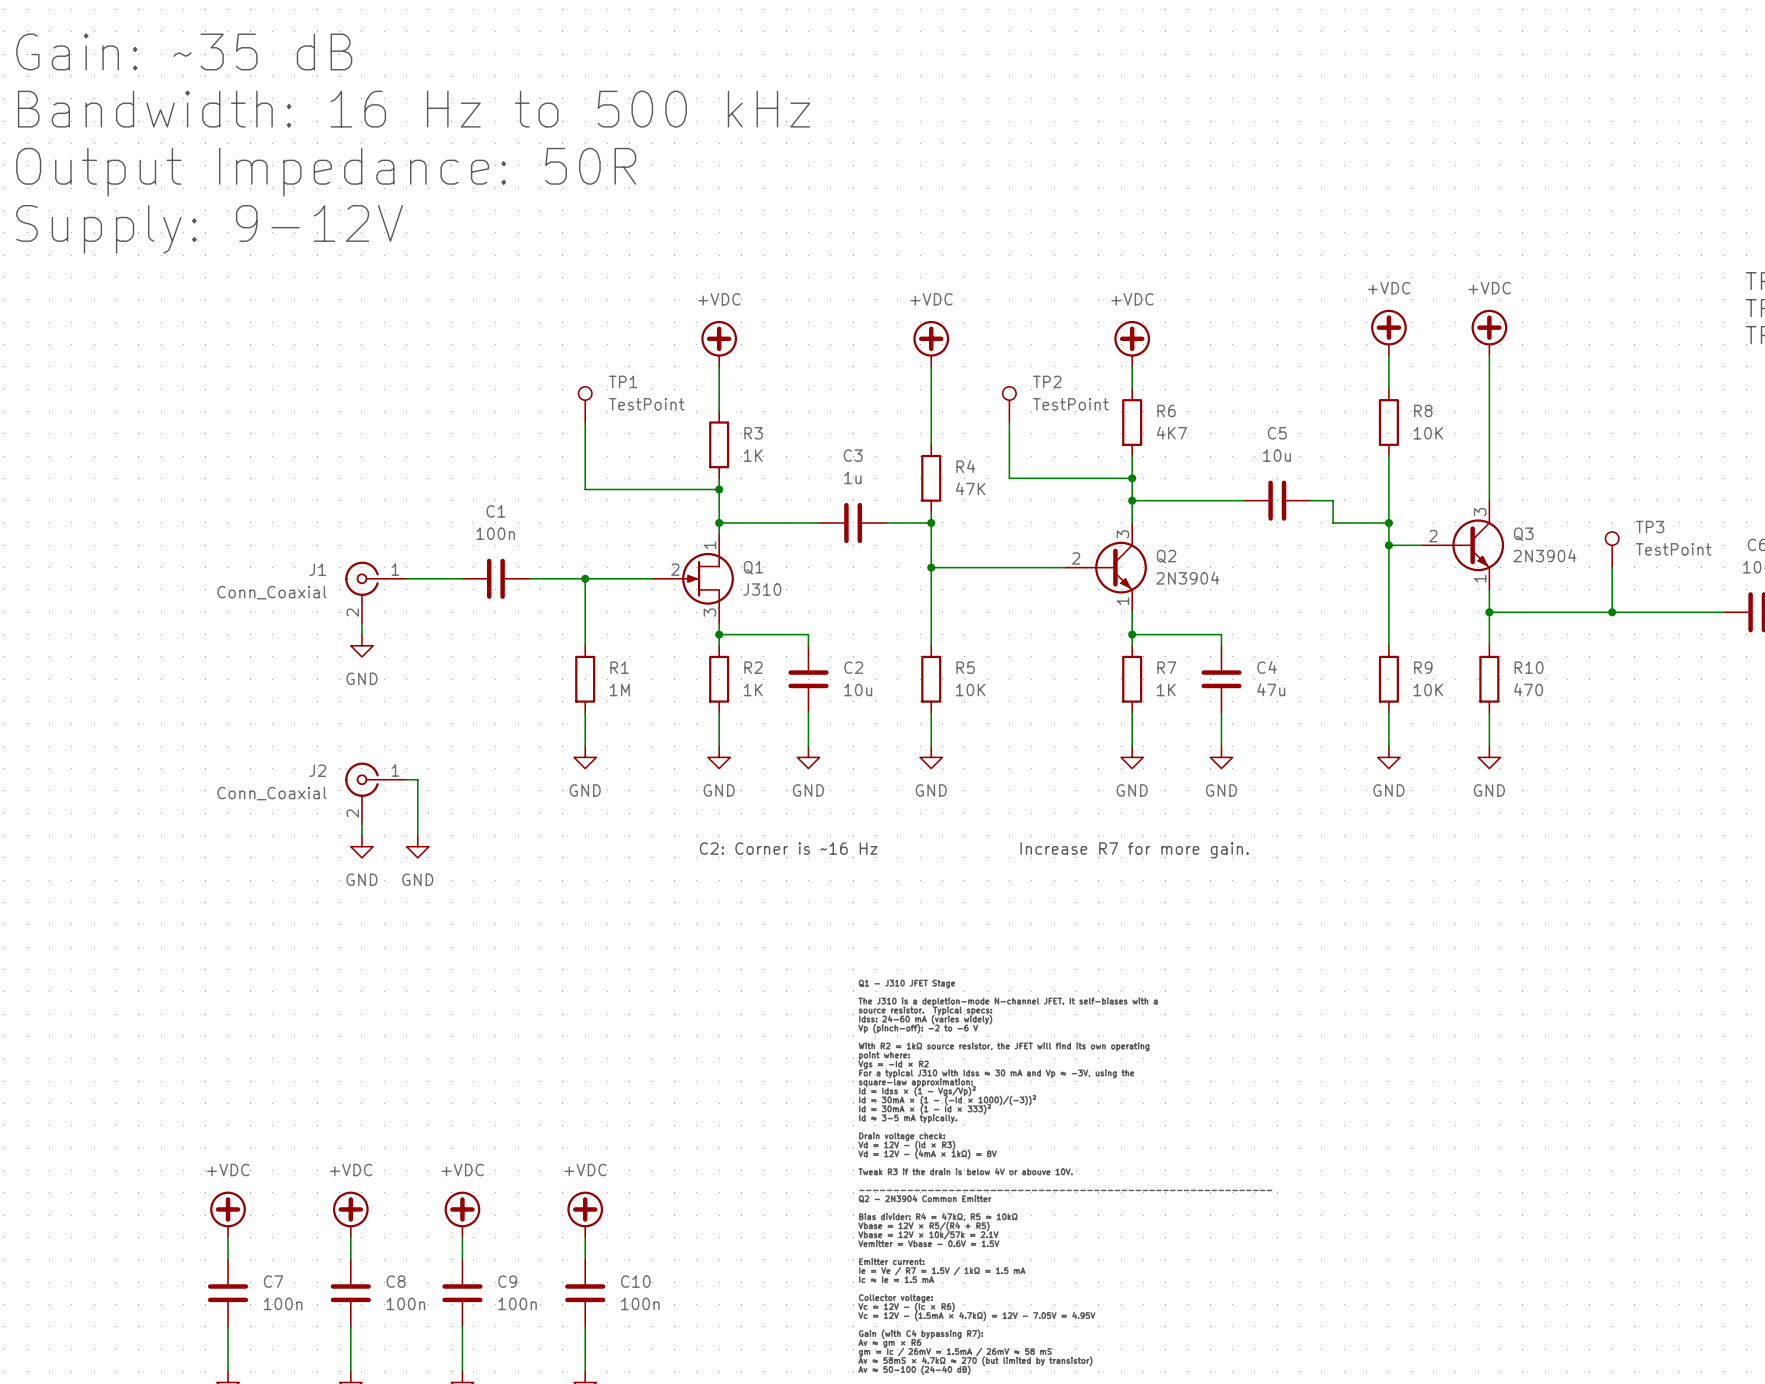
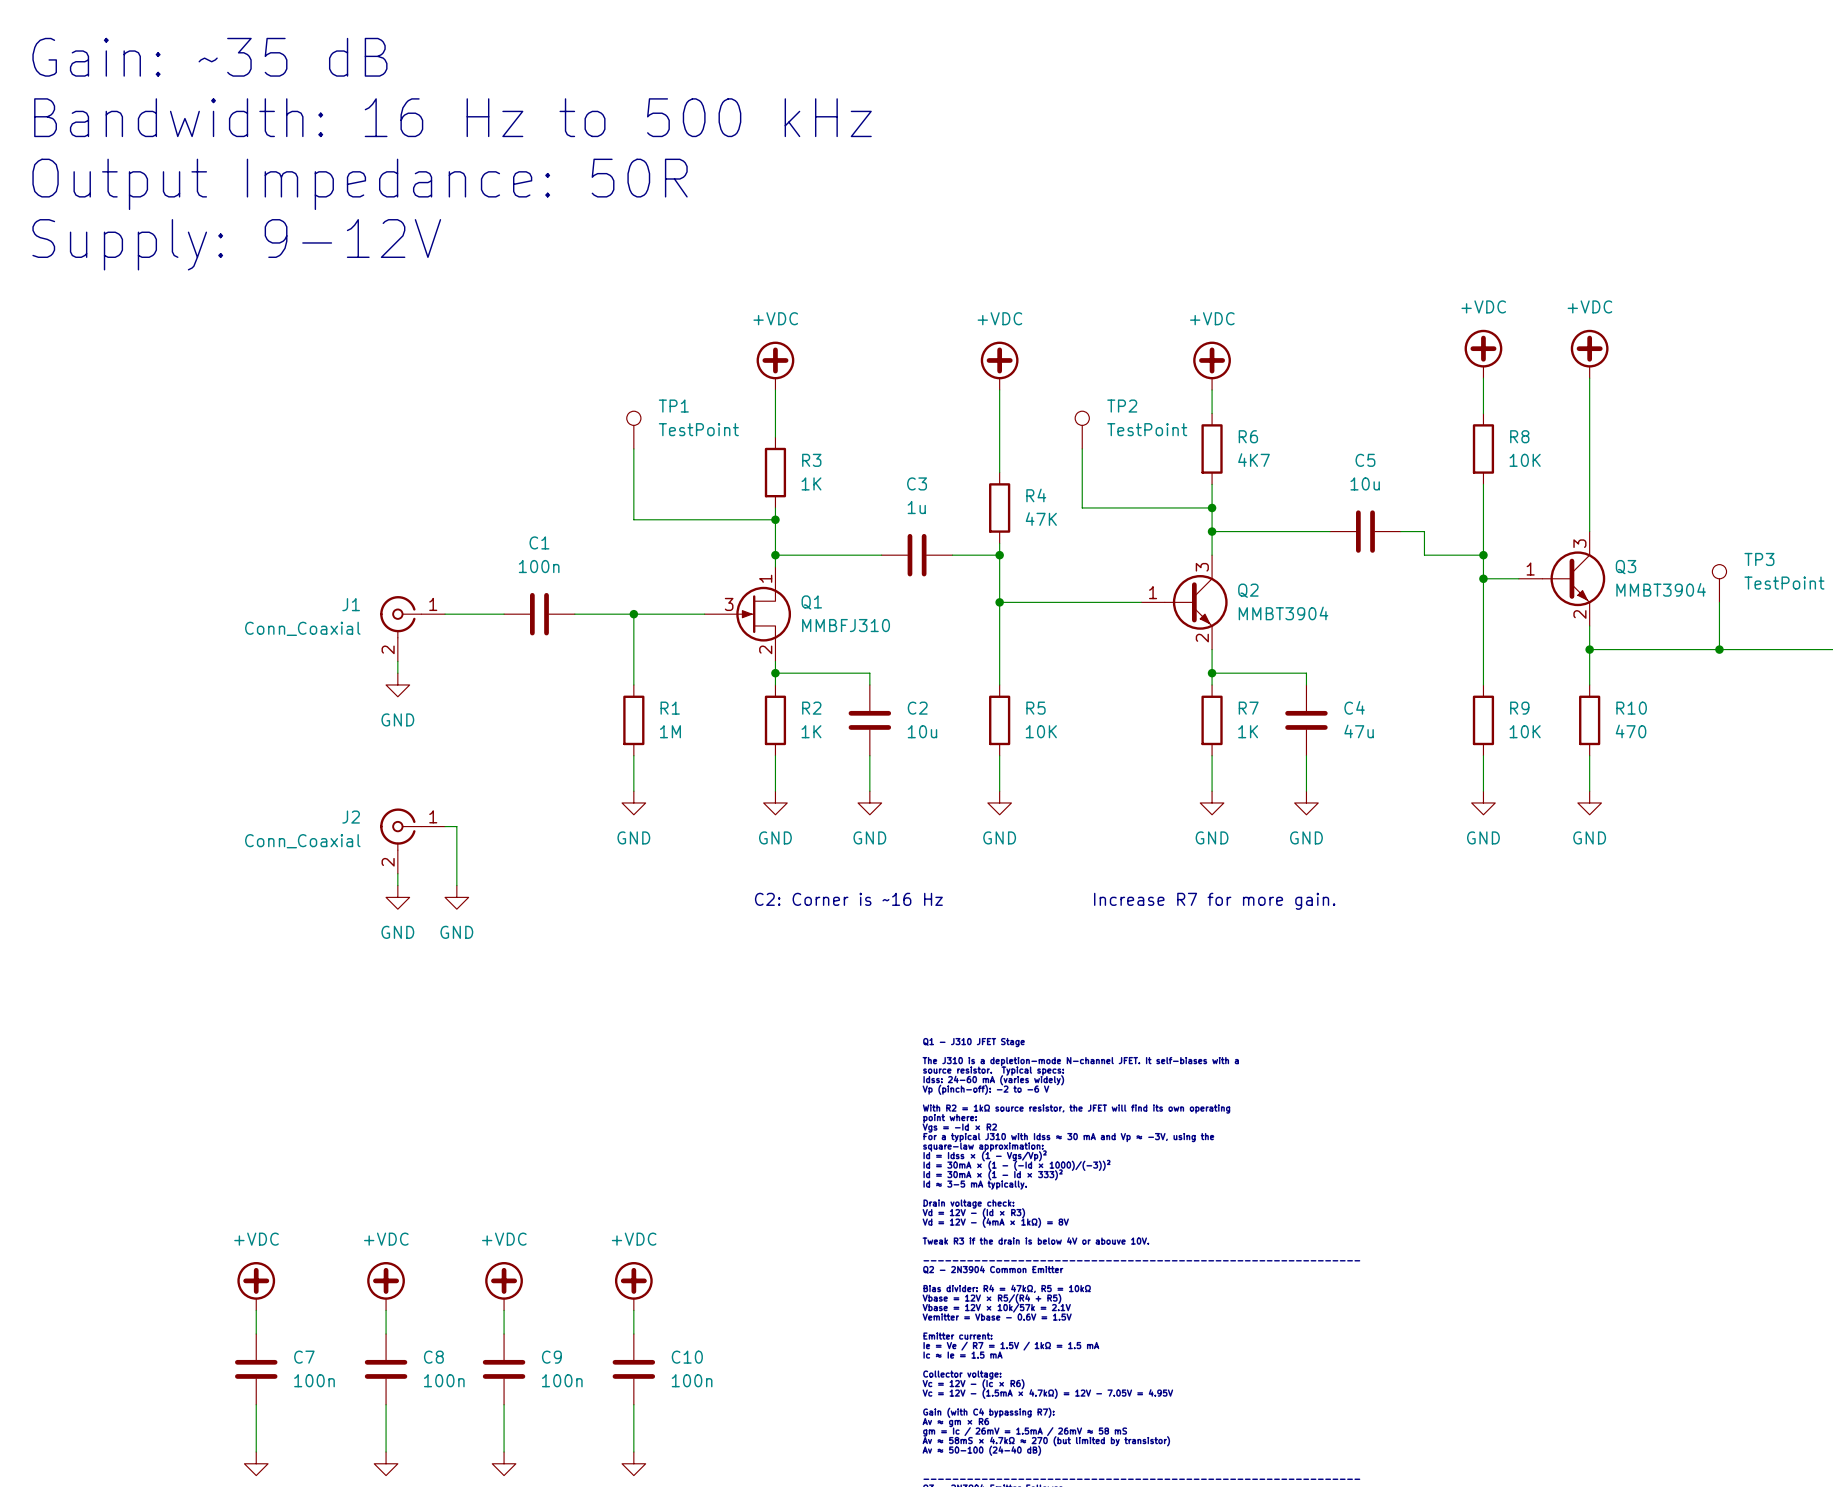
Q3 pin number: 2 (1433, 536) -> 1 (1530, 569)
Q3 value: 2N3904 (1545, 555) -> MMBT3904 (1661, 589)
Q2 pin number: 2 (1076, 558) -> 1 (1153, 592)
Q1 pin number: 2 (675, 569) -> 3 (729, 604)
Q2 value: 2N3904 (1187, 578) -> MMBT3904 (1283, 613)
Q3 pin number: 1 (1480, 578) -> 2 (1579, 614)
Q1 value: J310 (762, 589) -> MMBFJ310 (846, 625)
Q2 pin number: 1 (1122, 601) -> 2 (1202, 638)
Q1 pin number: 3 (709, 612) -> 2 (765, 649)

